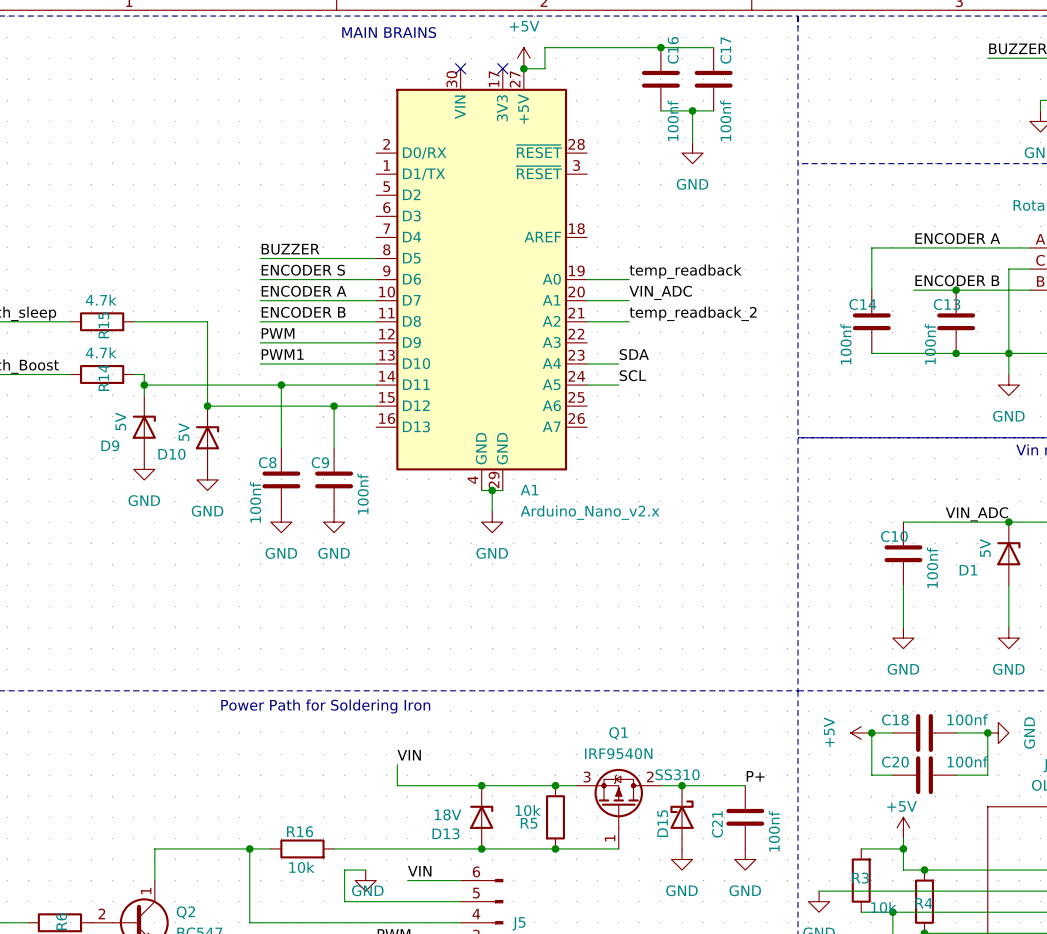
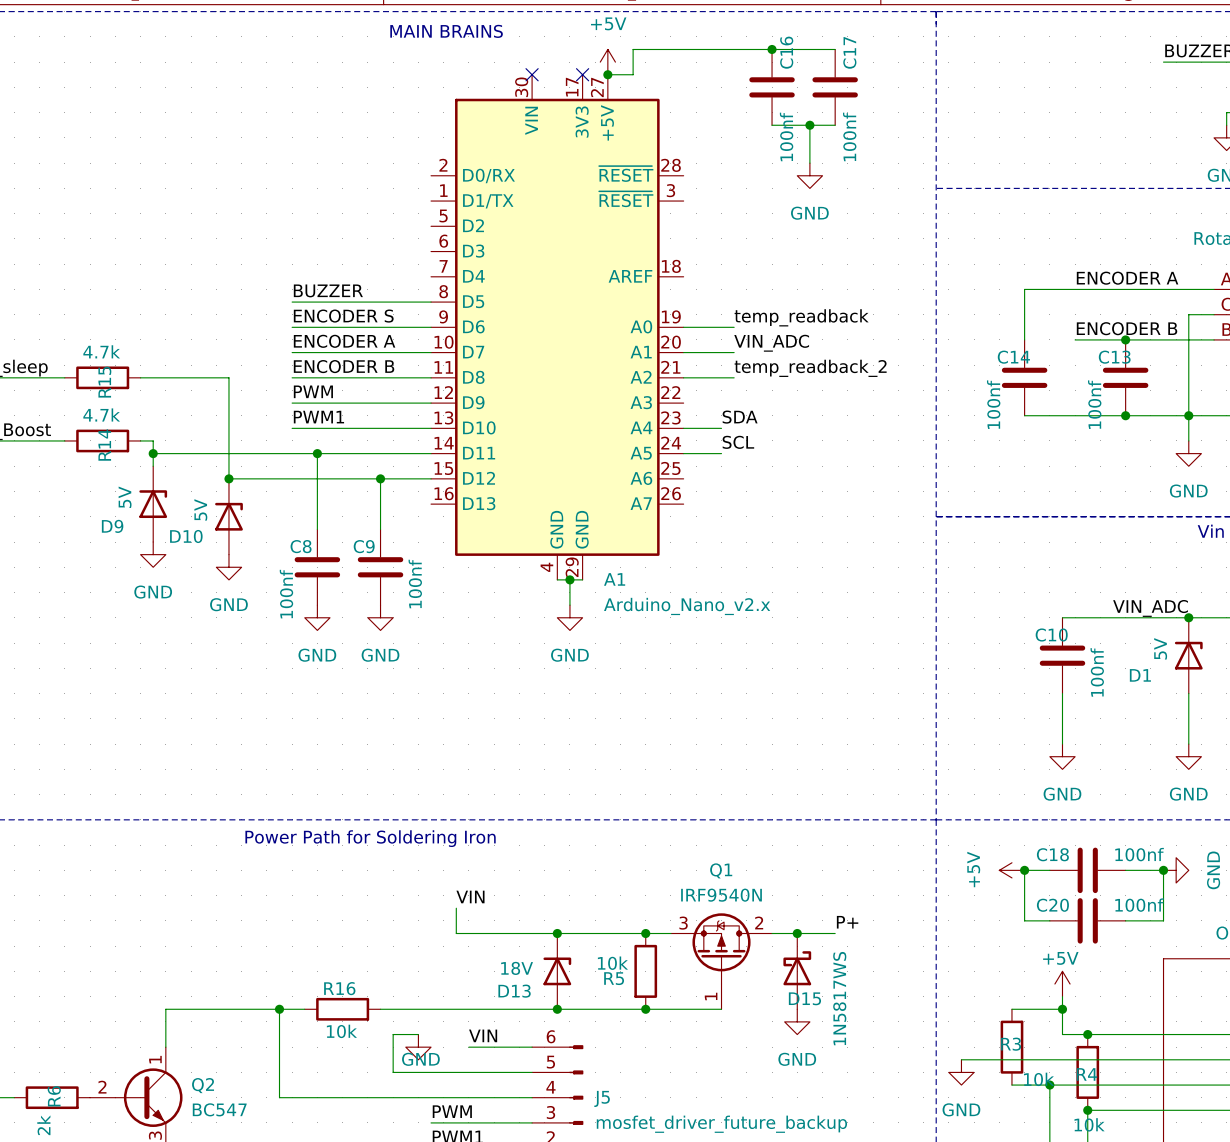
D15 value: SS310 (677, 774) -> 1N5817WS (839, 998)
label position: P+ (755, 776) -> P+ (847, 922)
wire: (713, 785) (745, 785) -> none
C21: 100nf (745, 817) -> none
D15 name rotation: 0° (662, 823) -> 90° clockwise (804, 998)
power symbol: GND (745, 859) -> none

